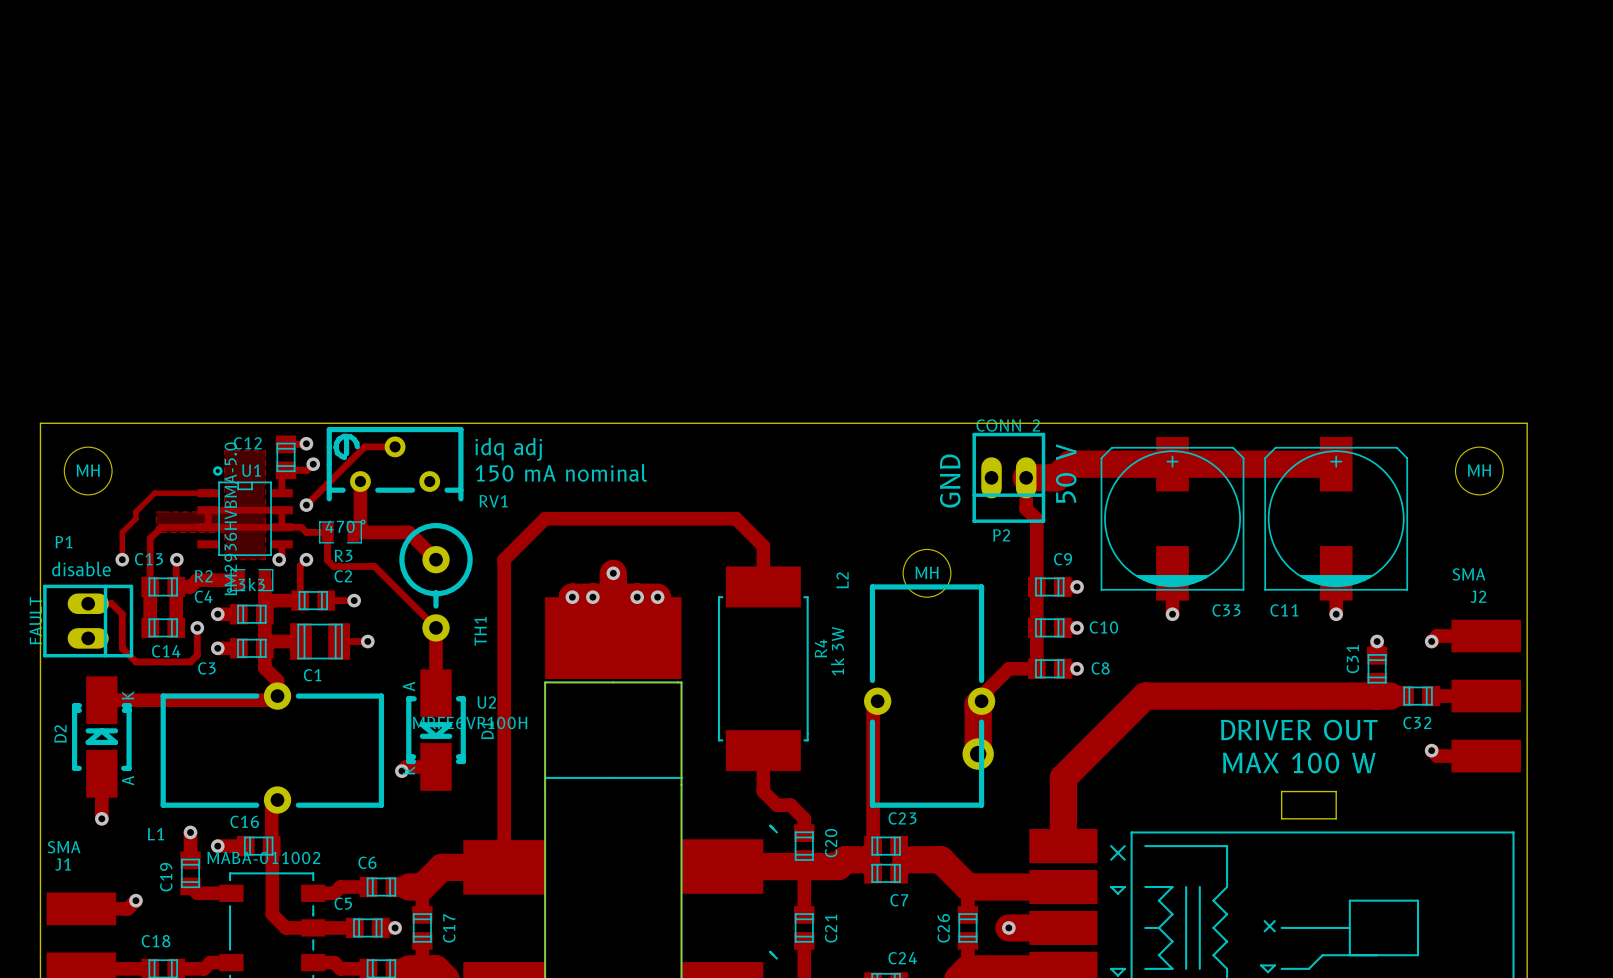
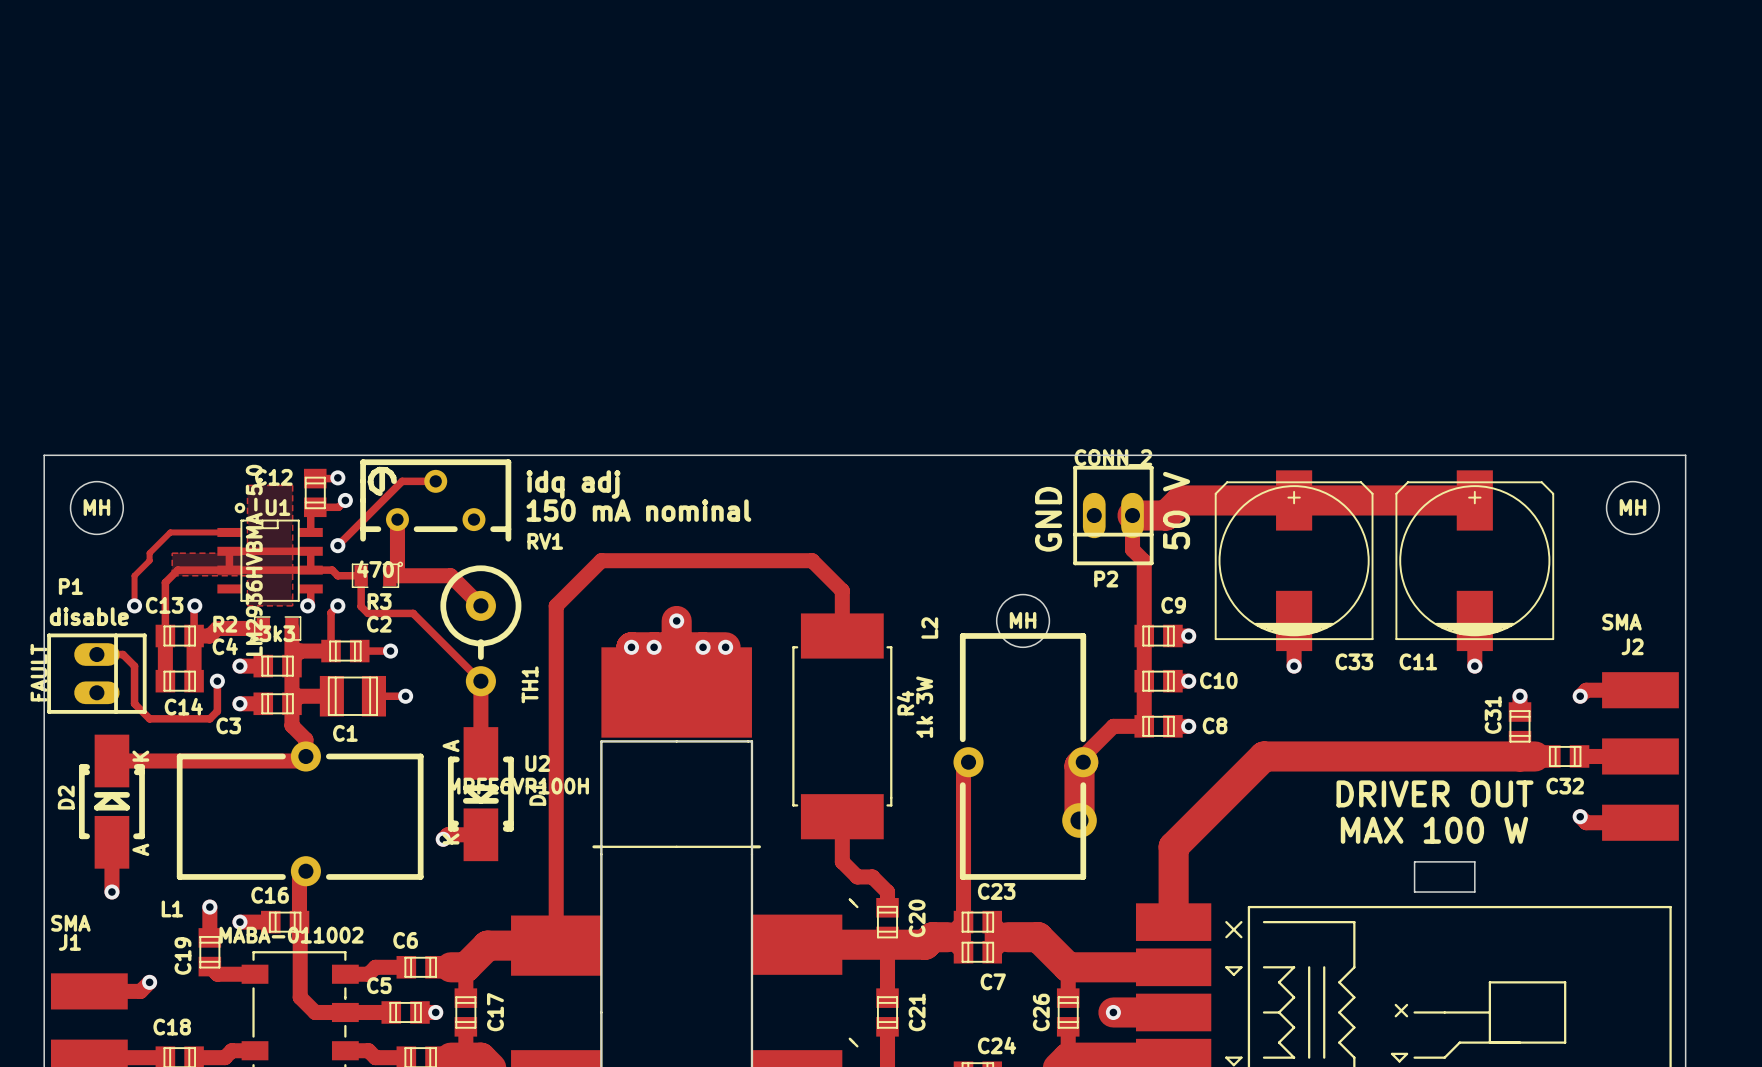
line: none -> (593, 846) (601, 846)
line: none -> (751, 846) (759, 846)

